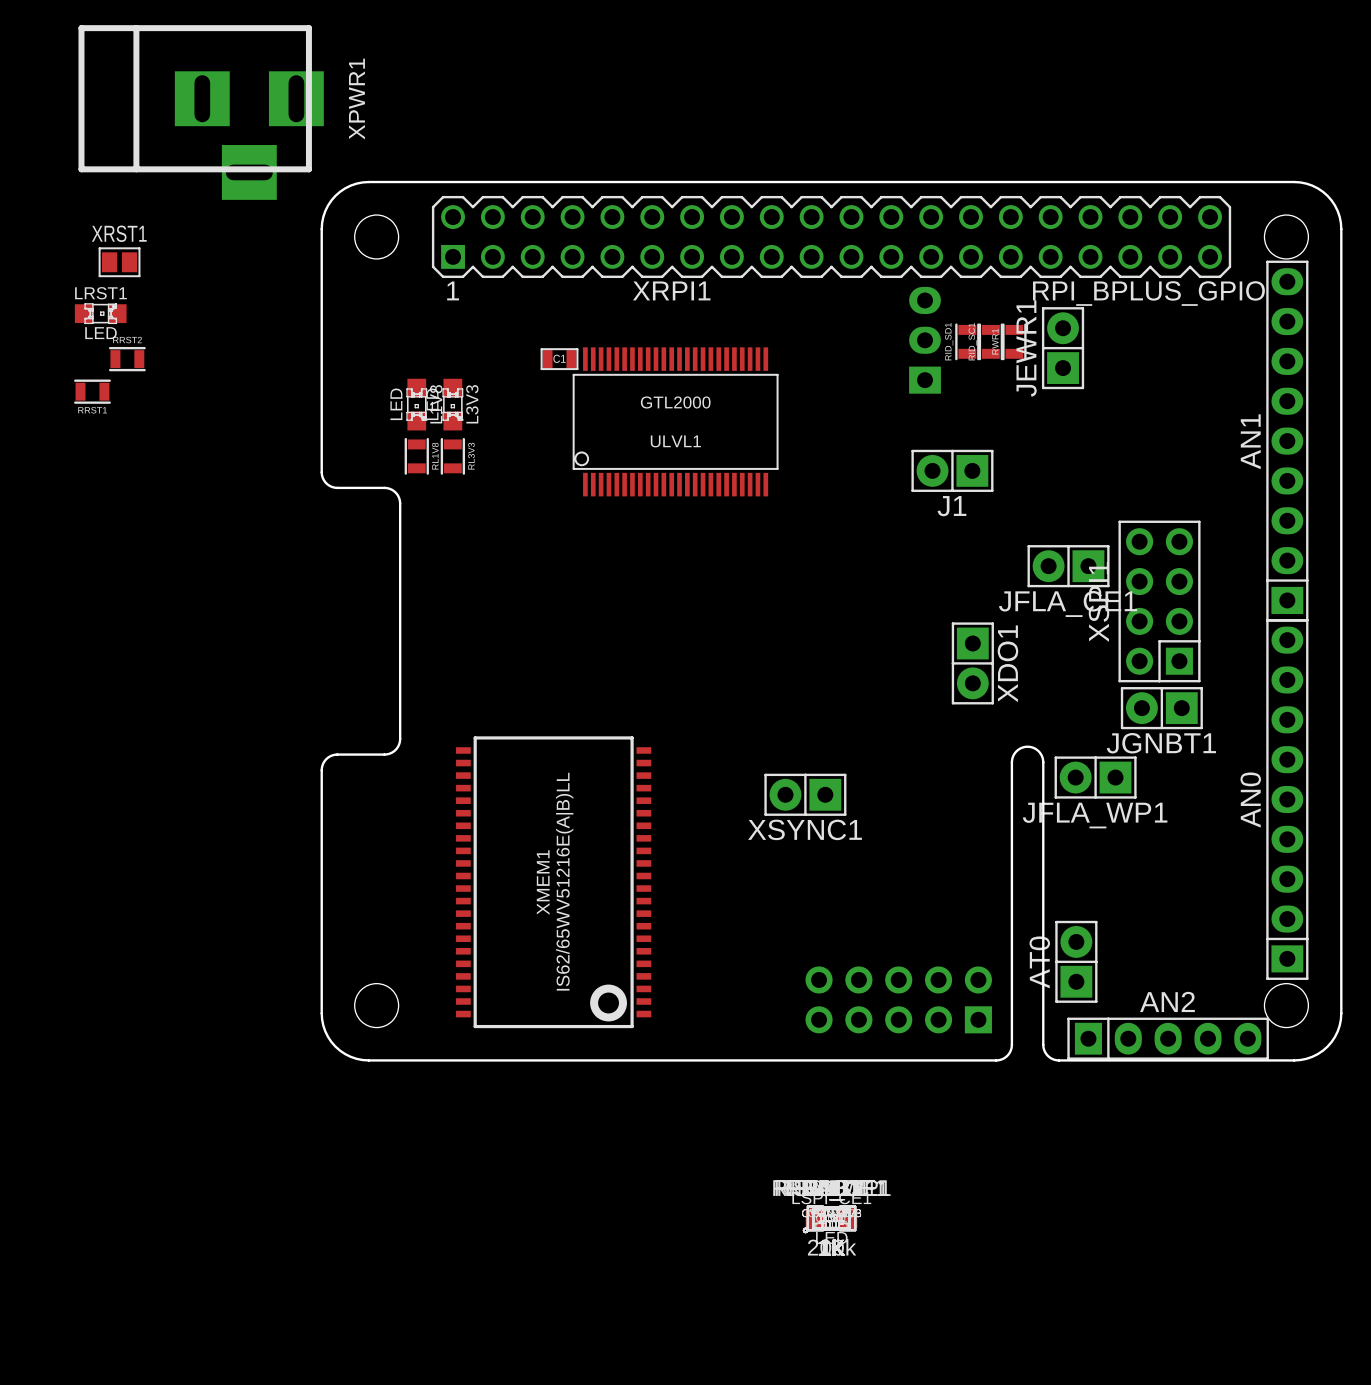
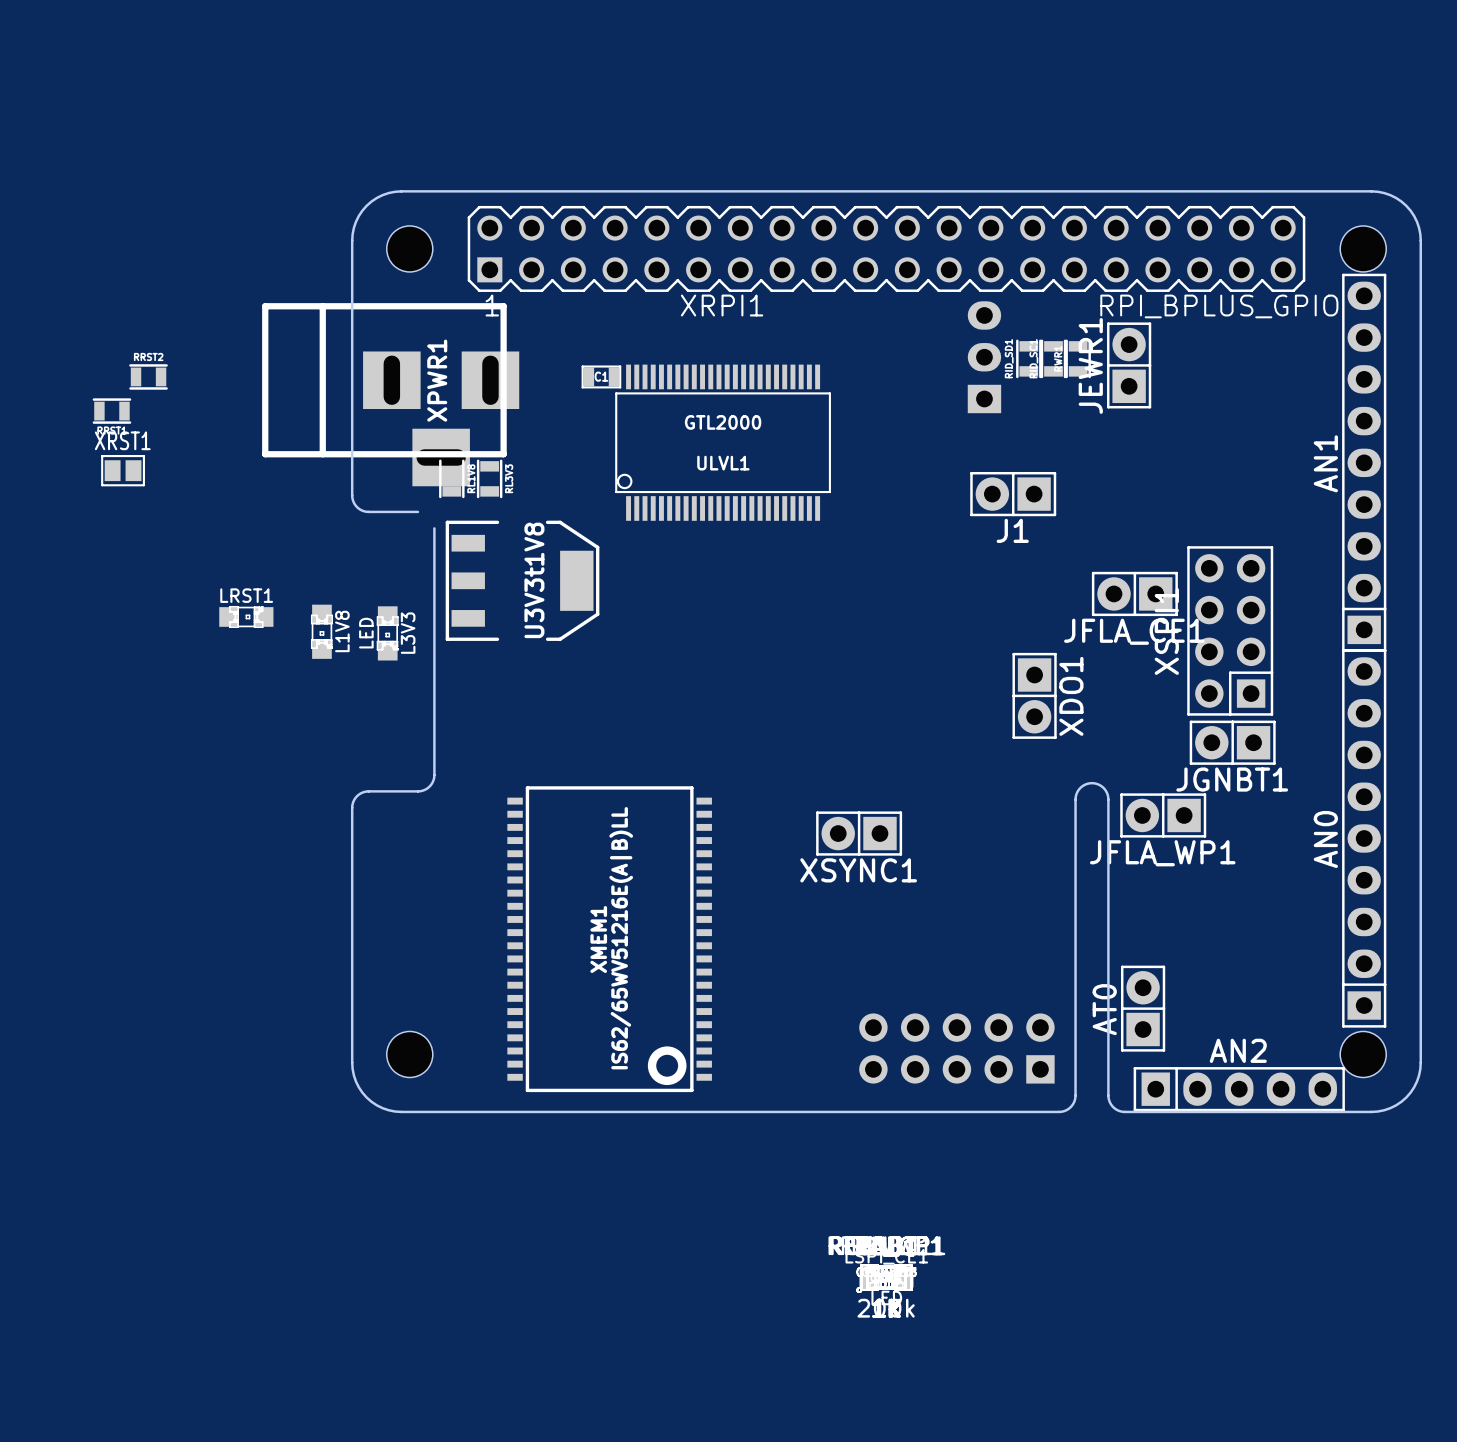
XPWR1 name position: XPWR1 (356, 99) -> XPWR1 (437, 380)
XPWR1 position: (201, 112) -> (390, 394)
XRST1 position: (119, 262) -> (123, 470)
LRST1 position: (100, 313) -> (246, 616)
LRST1 value: LED (101, 333) -> none
L1V8 value: LED (396, 404) -> none
L1V8 position: (416, 404) -> (321, 631)
L3V3 position: (452, 404) -> (387, 633)
board edge: (384, 487) (395, 492) (400, 503) -> none
U3V3t1V8: none -> (522, 580)
XMEM1 position: (553, 882) -> (609, 939)

